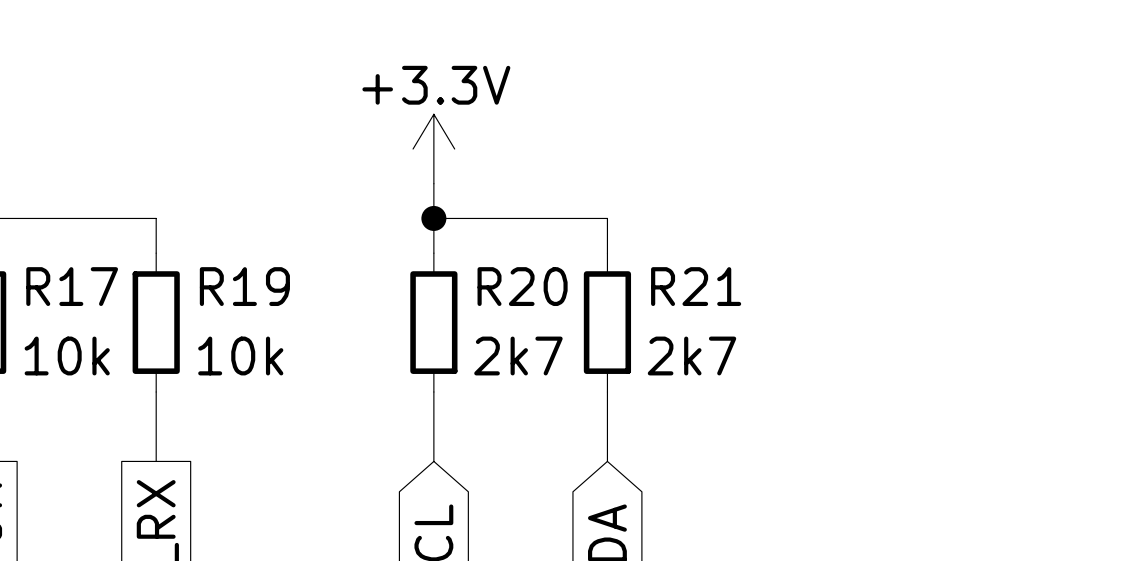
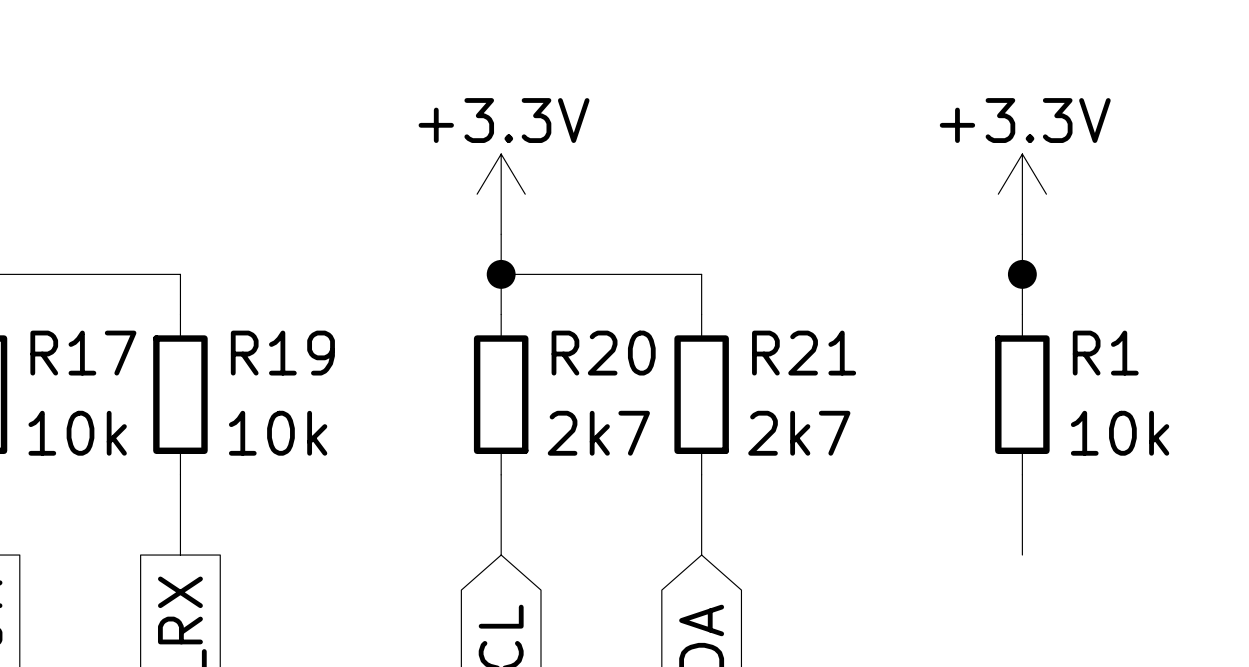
power symbol: none -> +3.3V (1022, 194)
wire: none -> (1022, 234) (1022, 314)
junction: none -> (1022, 274)
R1: none -> 10k (1022, 394)
wire: none -> (1022, 474) (1022, 555)

